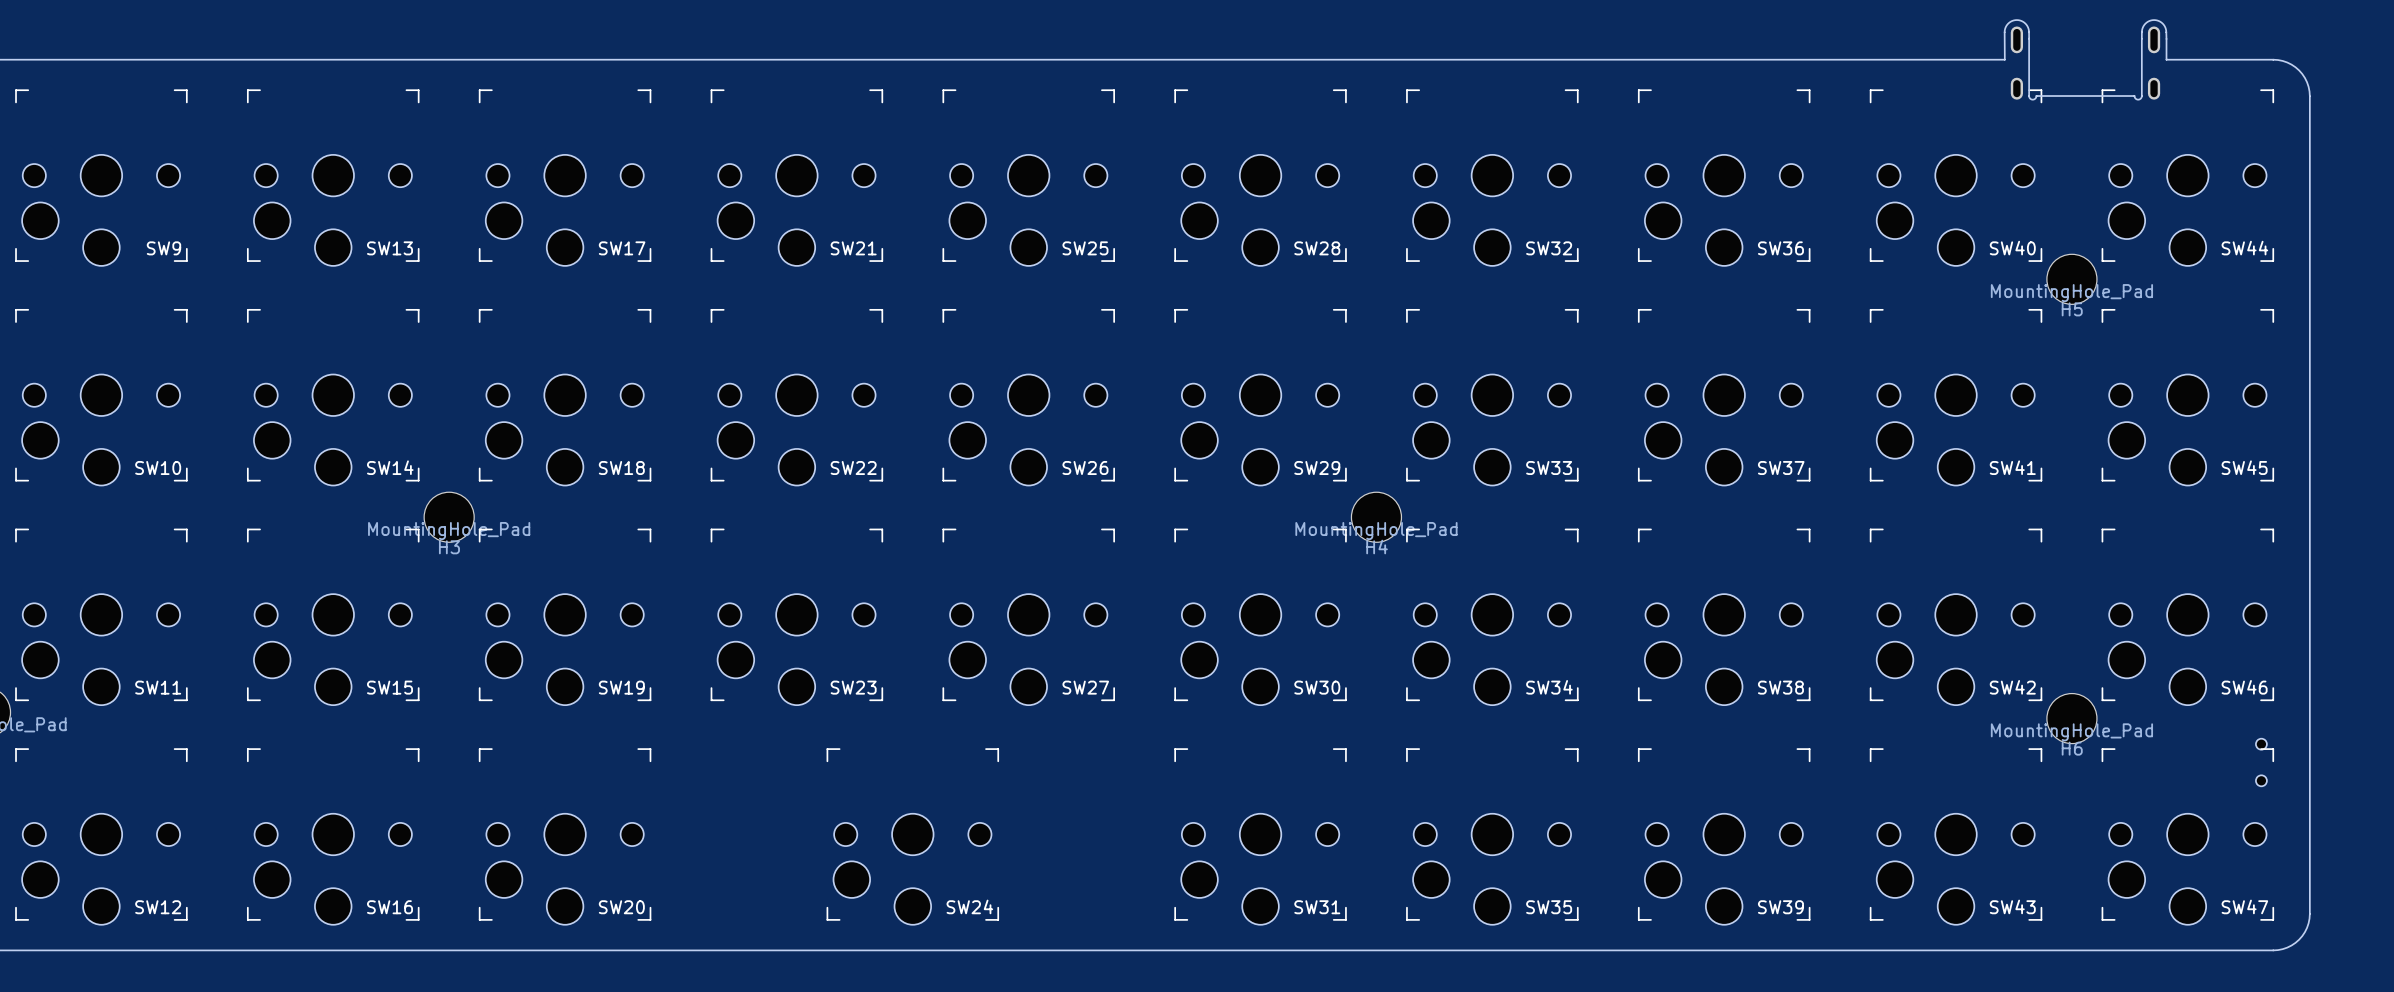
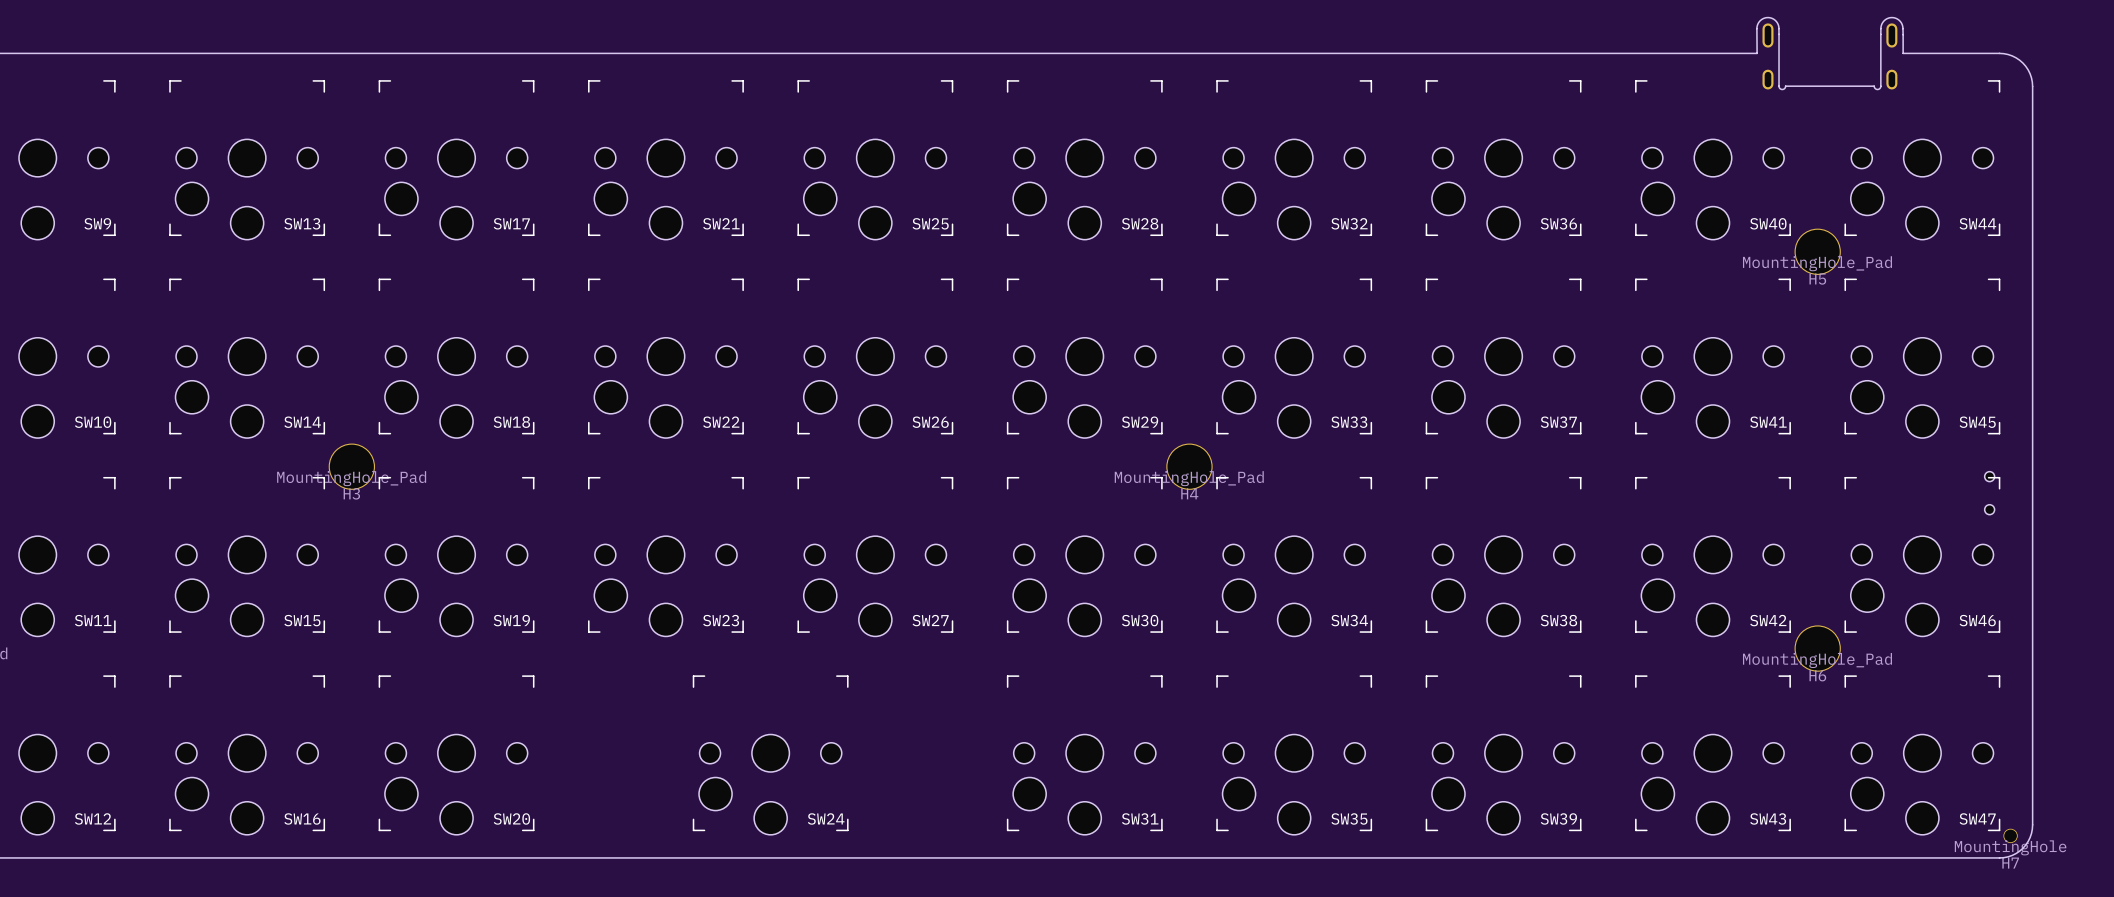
SW40 footprint: [1870, 89, 2043, 266] -> [1635, 80, 1791, 240]
SW44 footprint: [2101, 89, 2274, 266] -> [1844, 80, 2001, 240]
part position: (2261, 762) -> (1989, 493)
H7: none -> MountingHole (2010, 835)

